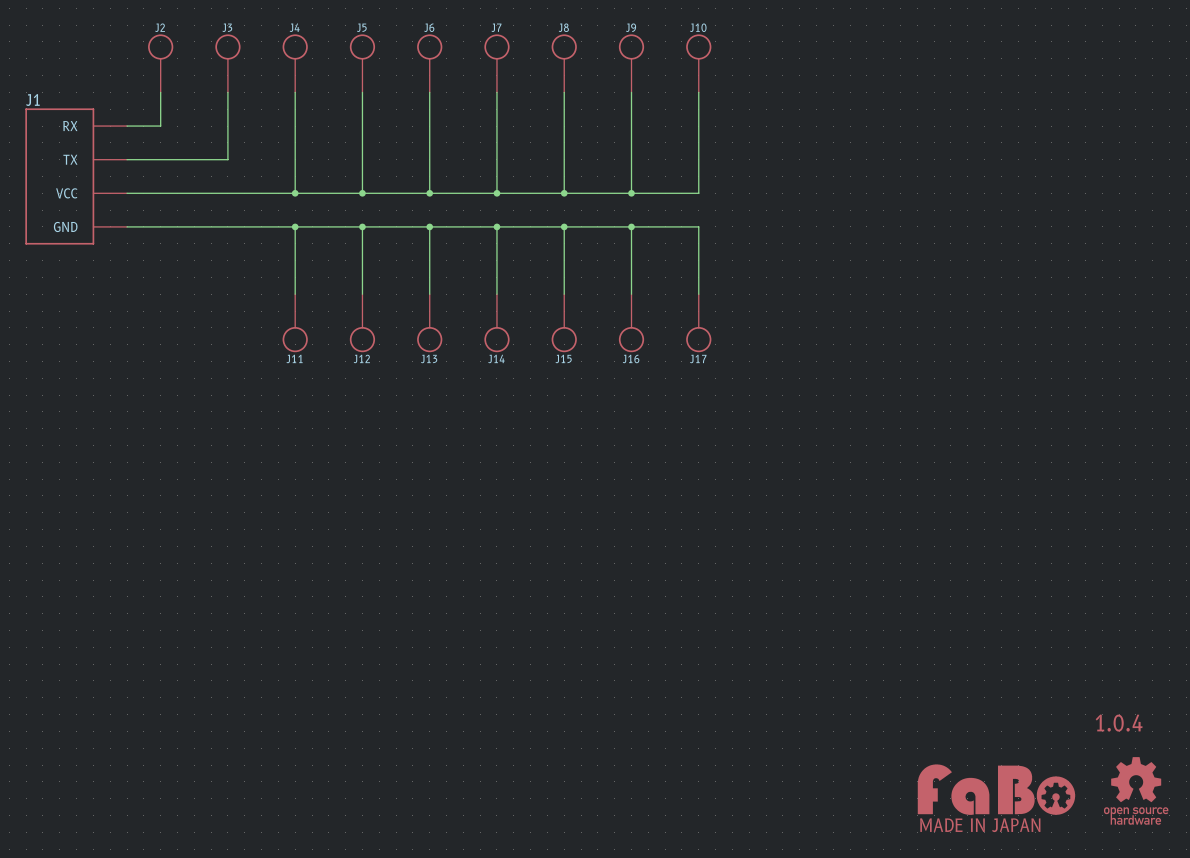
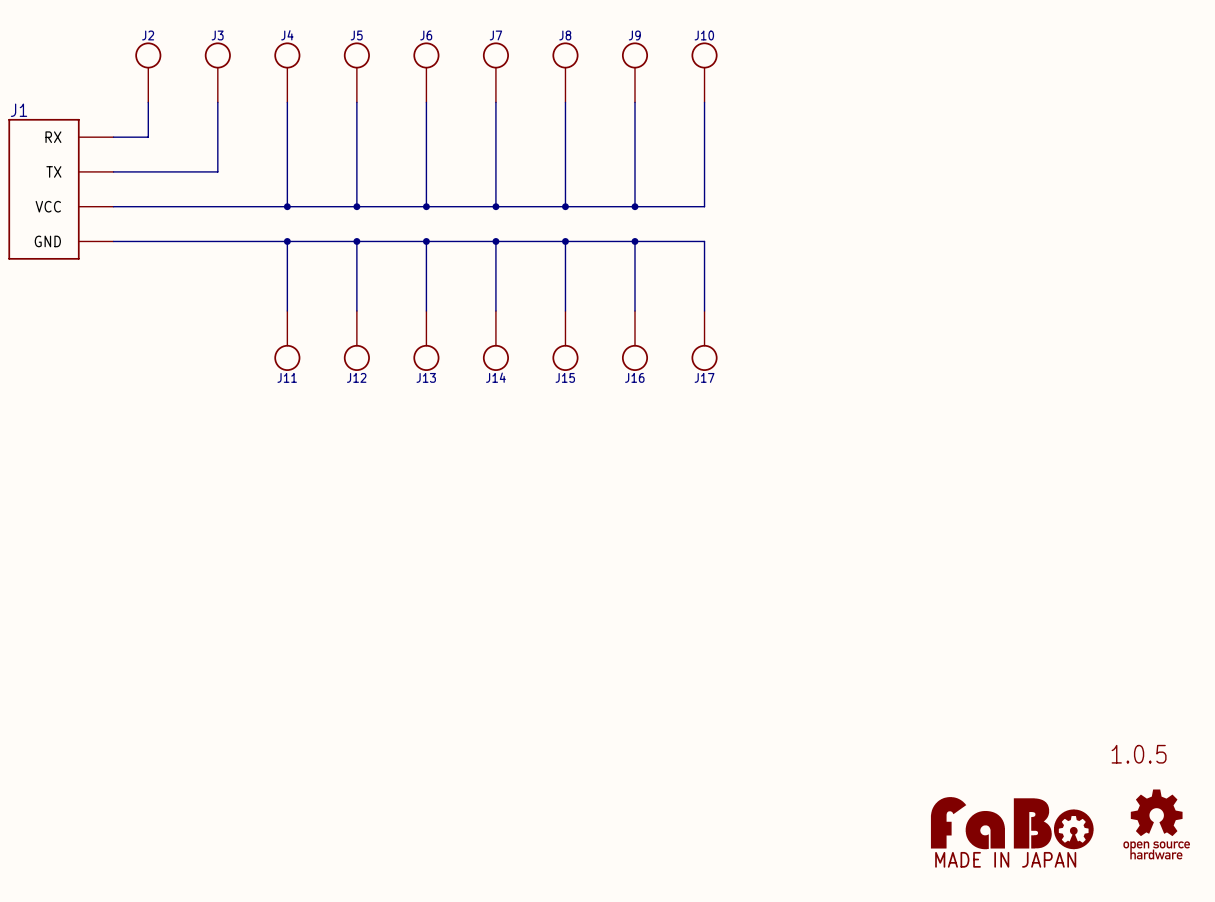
text: 1.0.4 (1119, 723) -> 1.0.5 (1139, 754)

